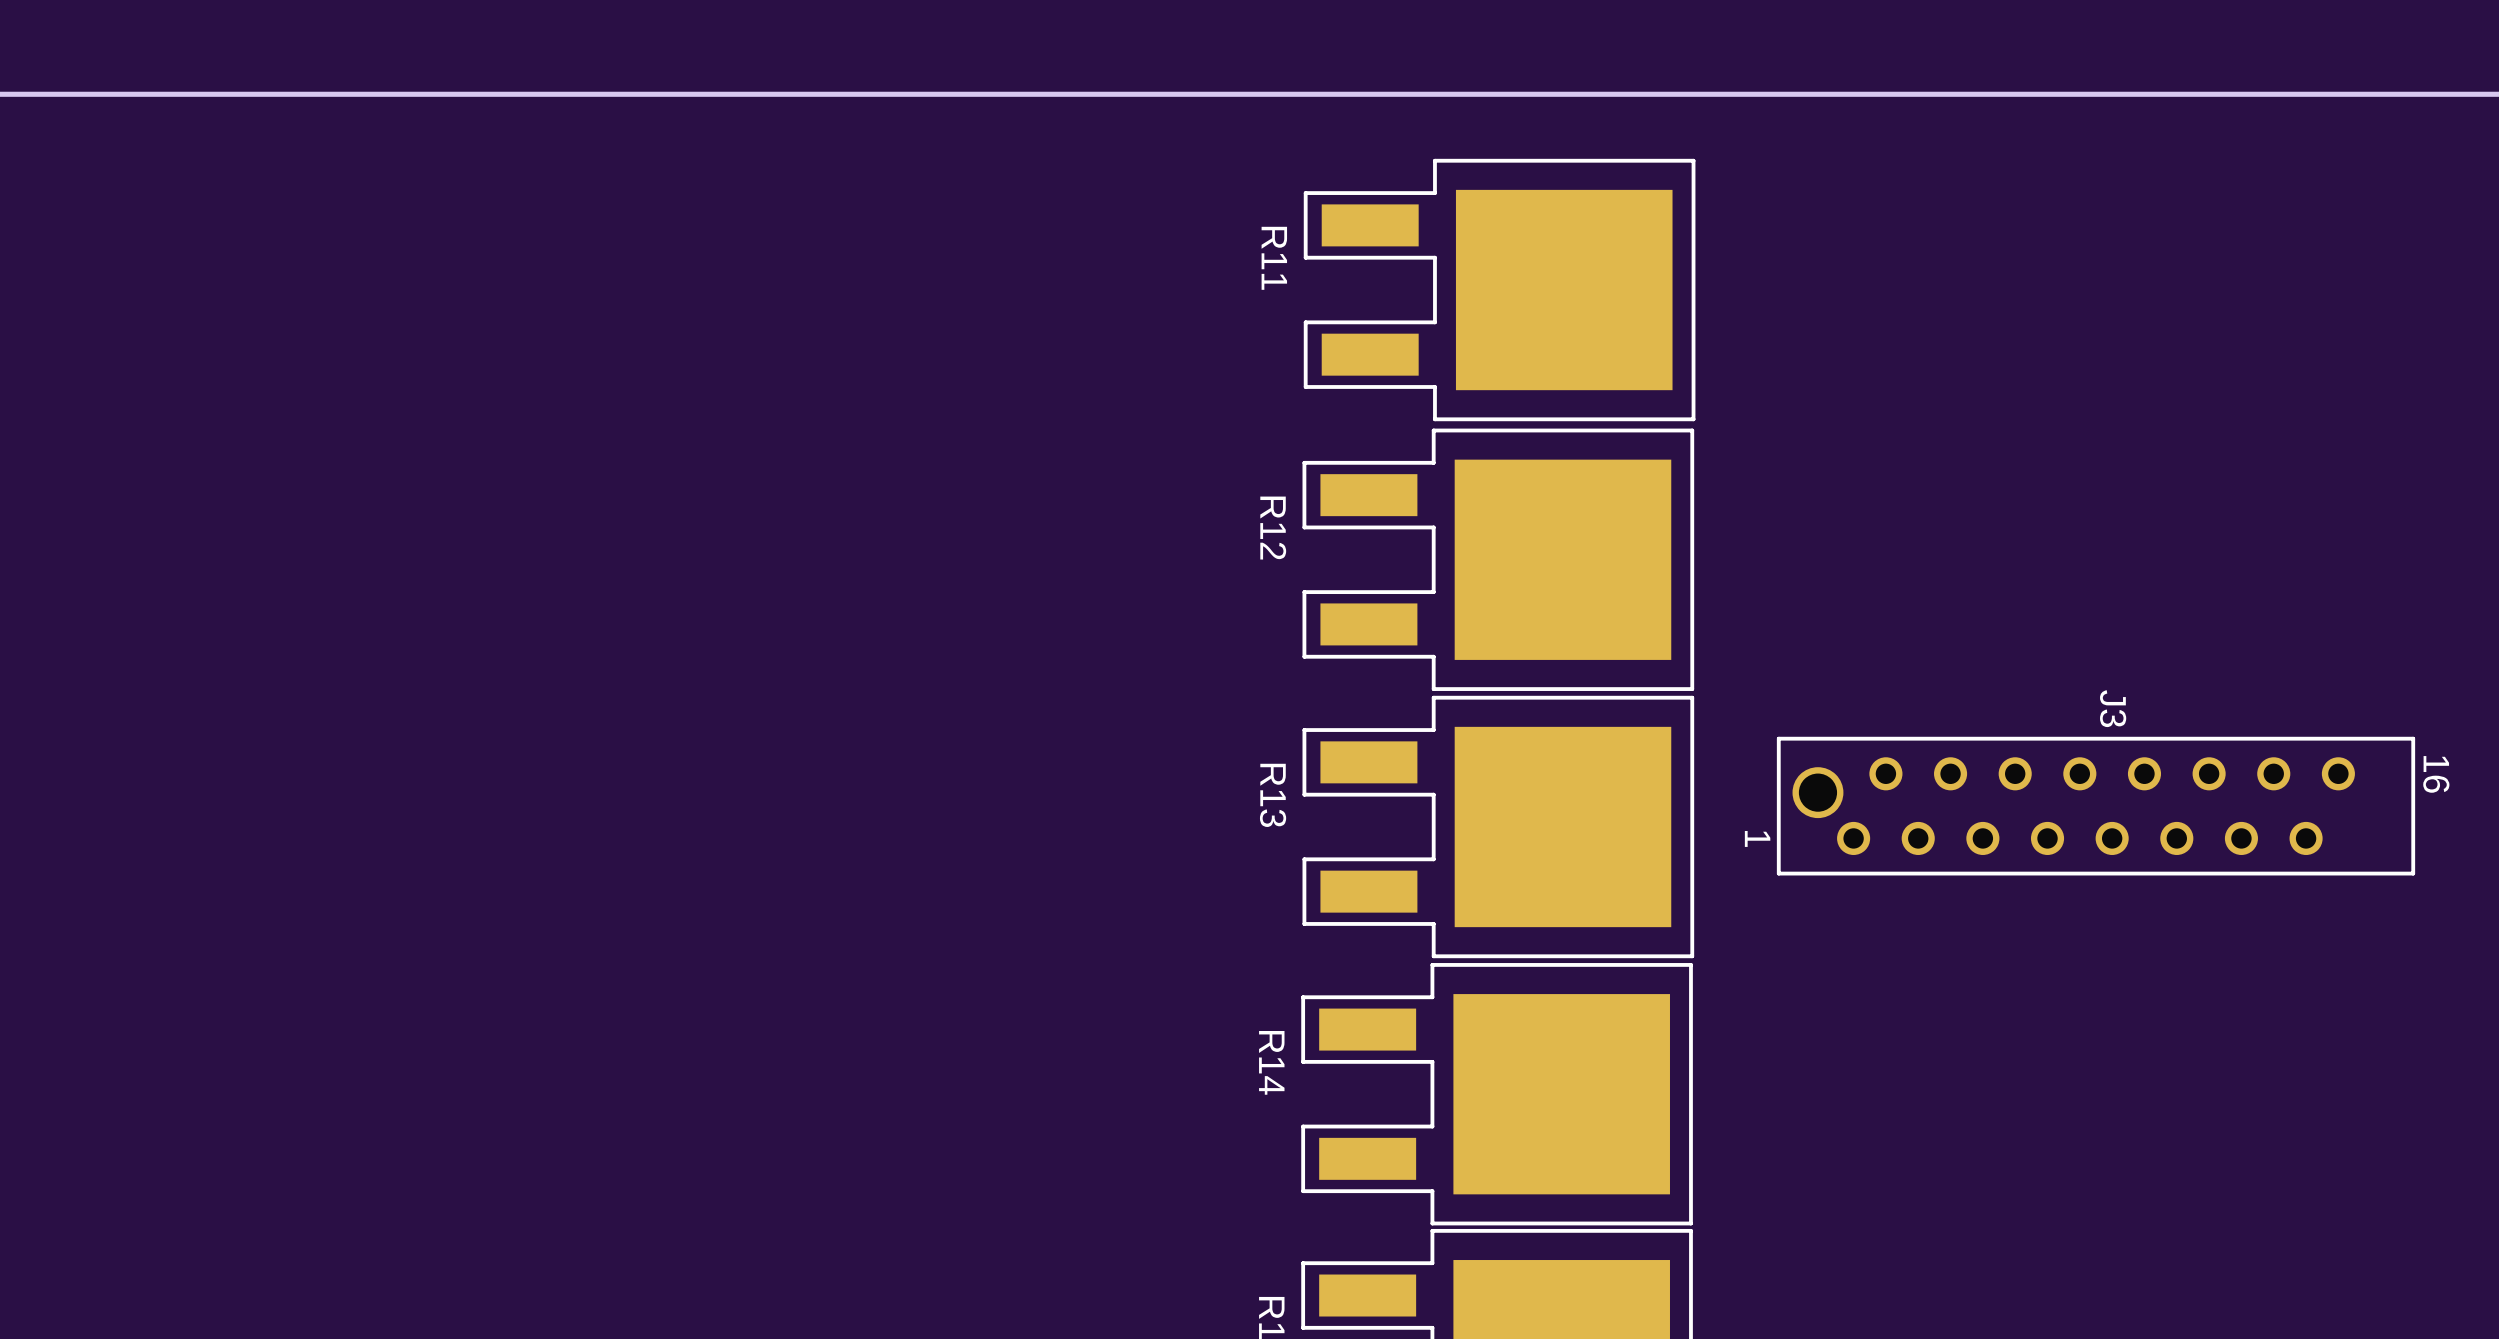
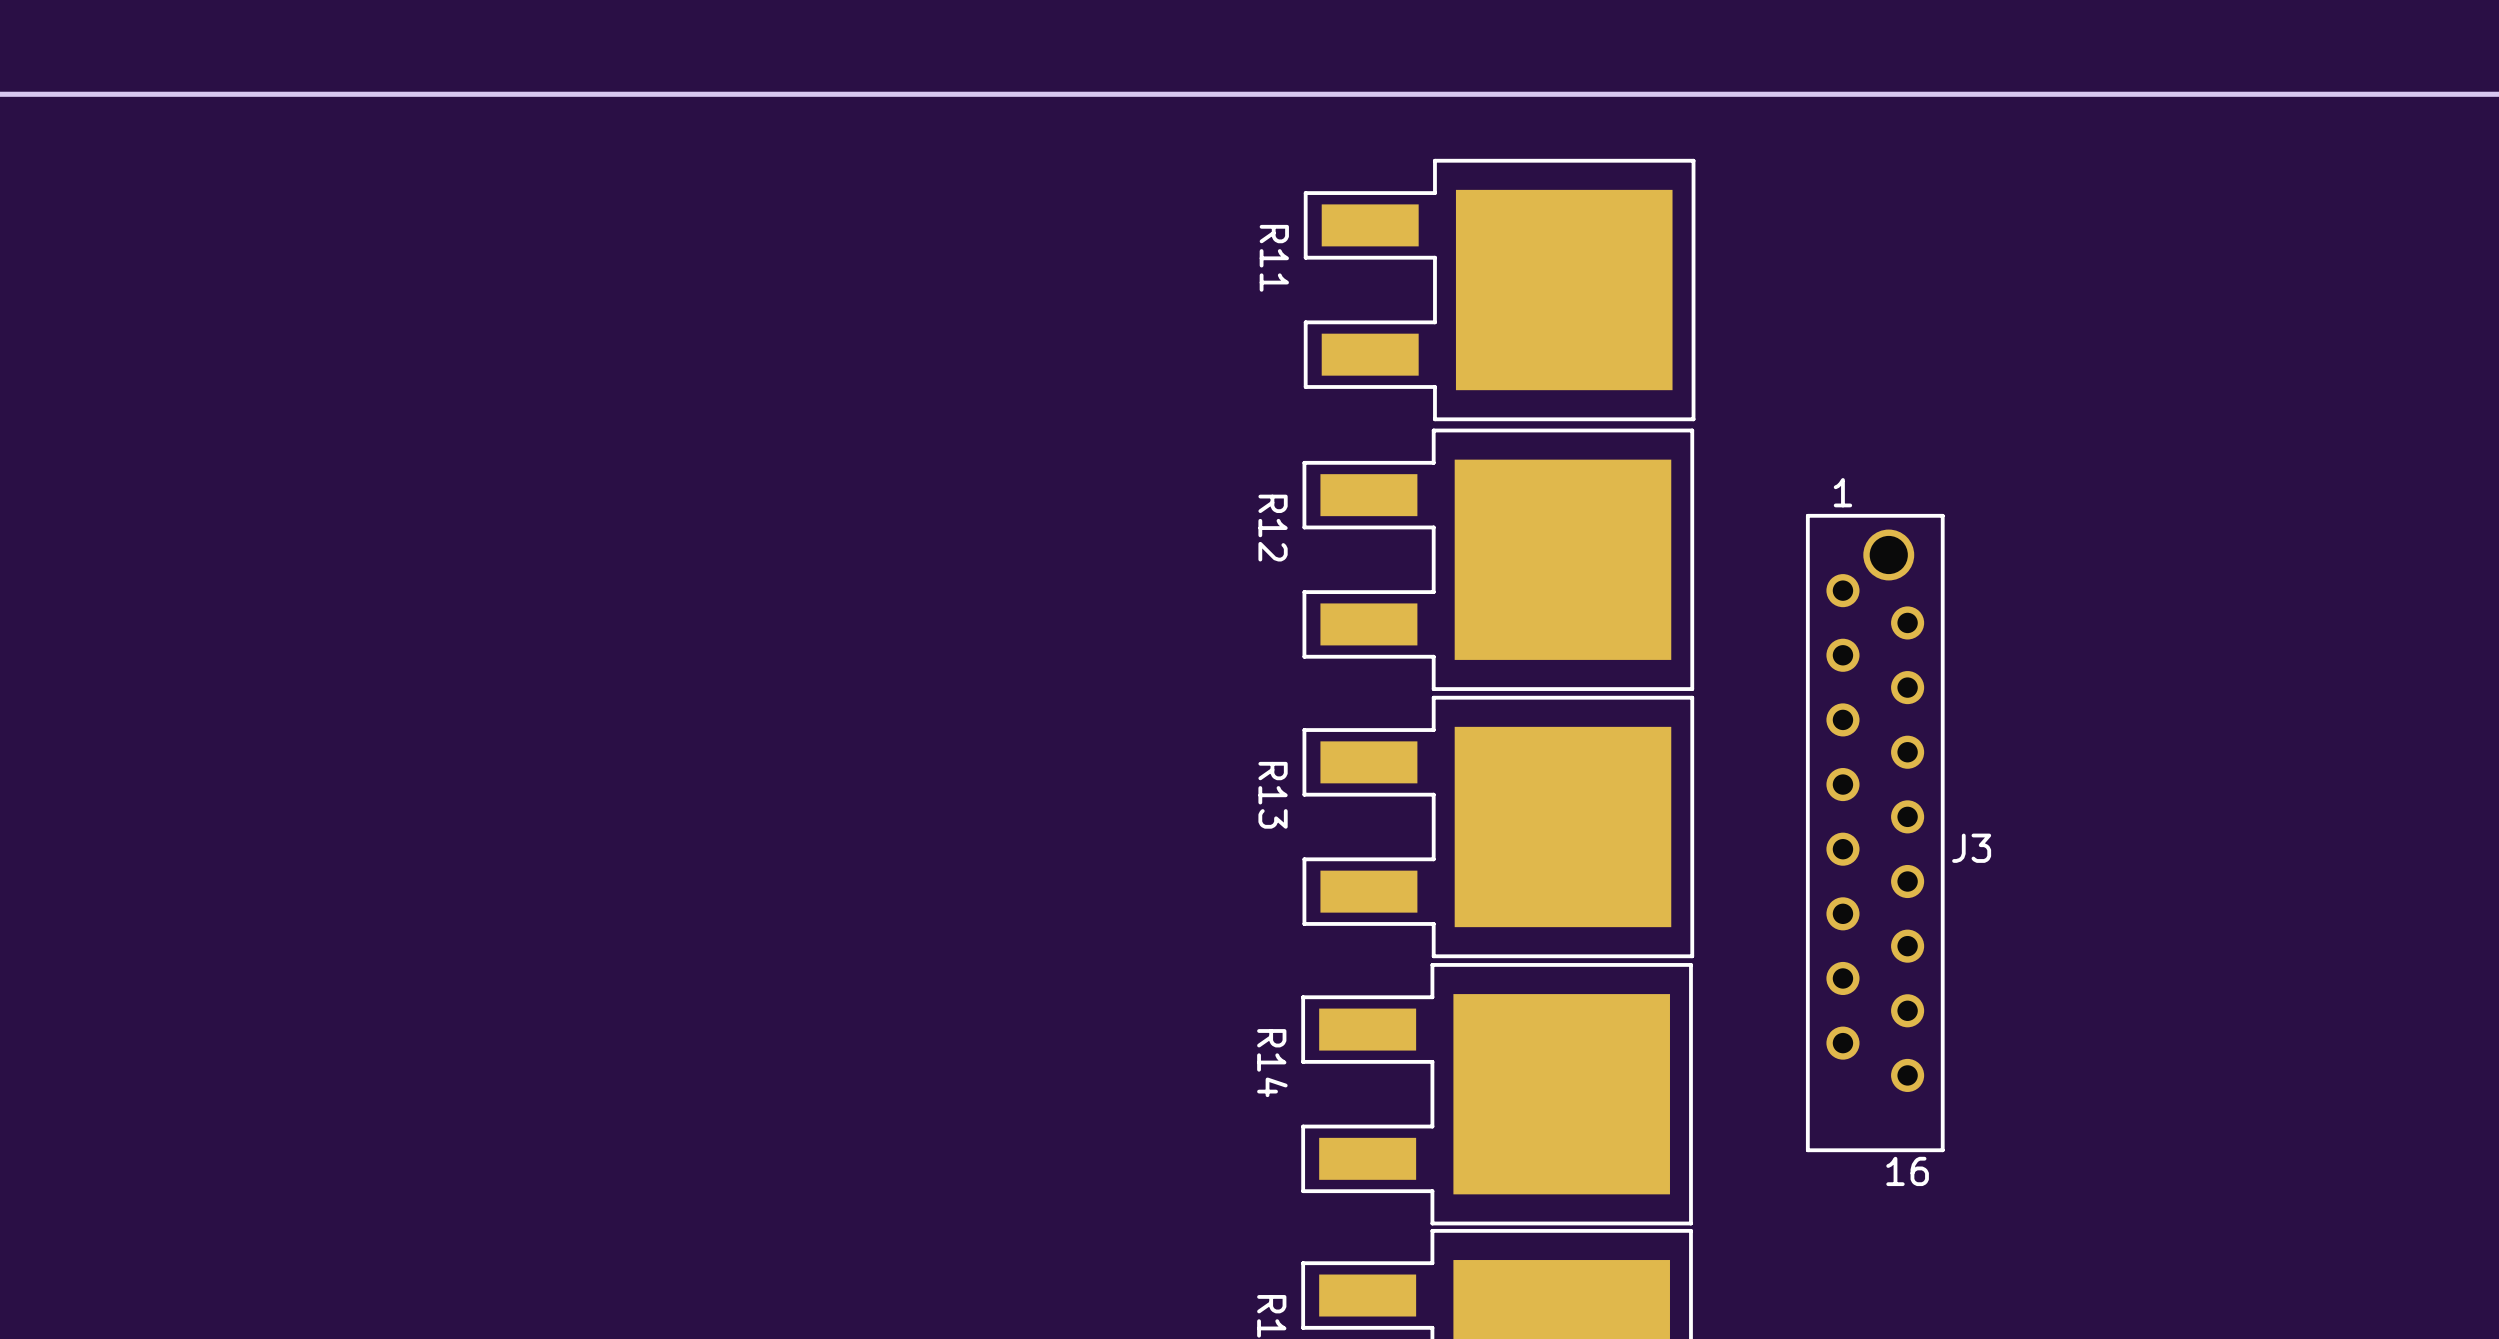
J3 rotation: 0° (2096, 806) -> 90° clockwise (1875, 833)

